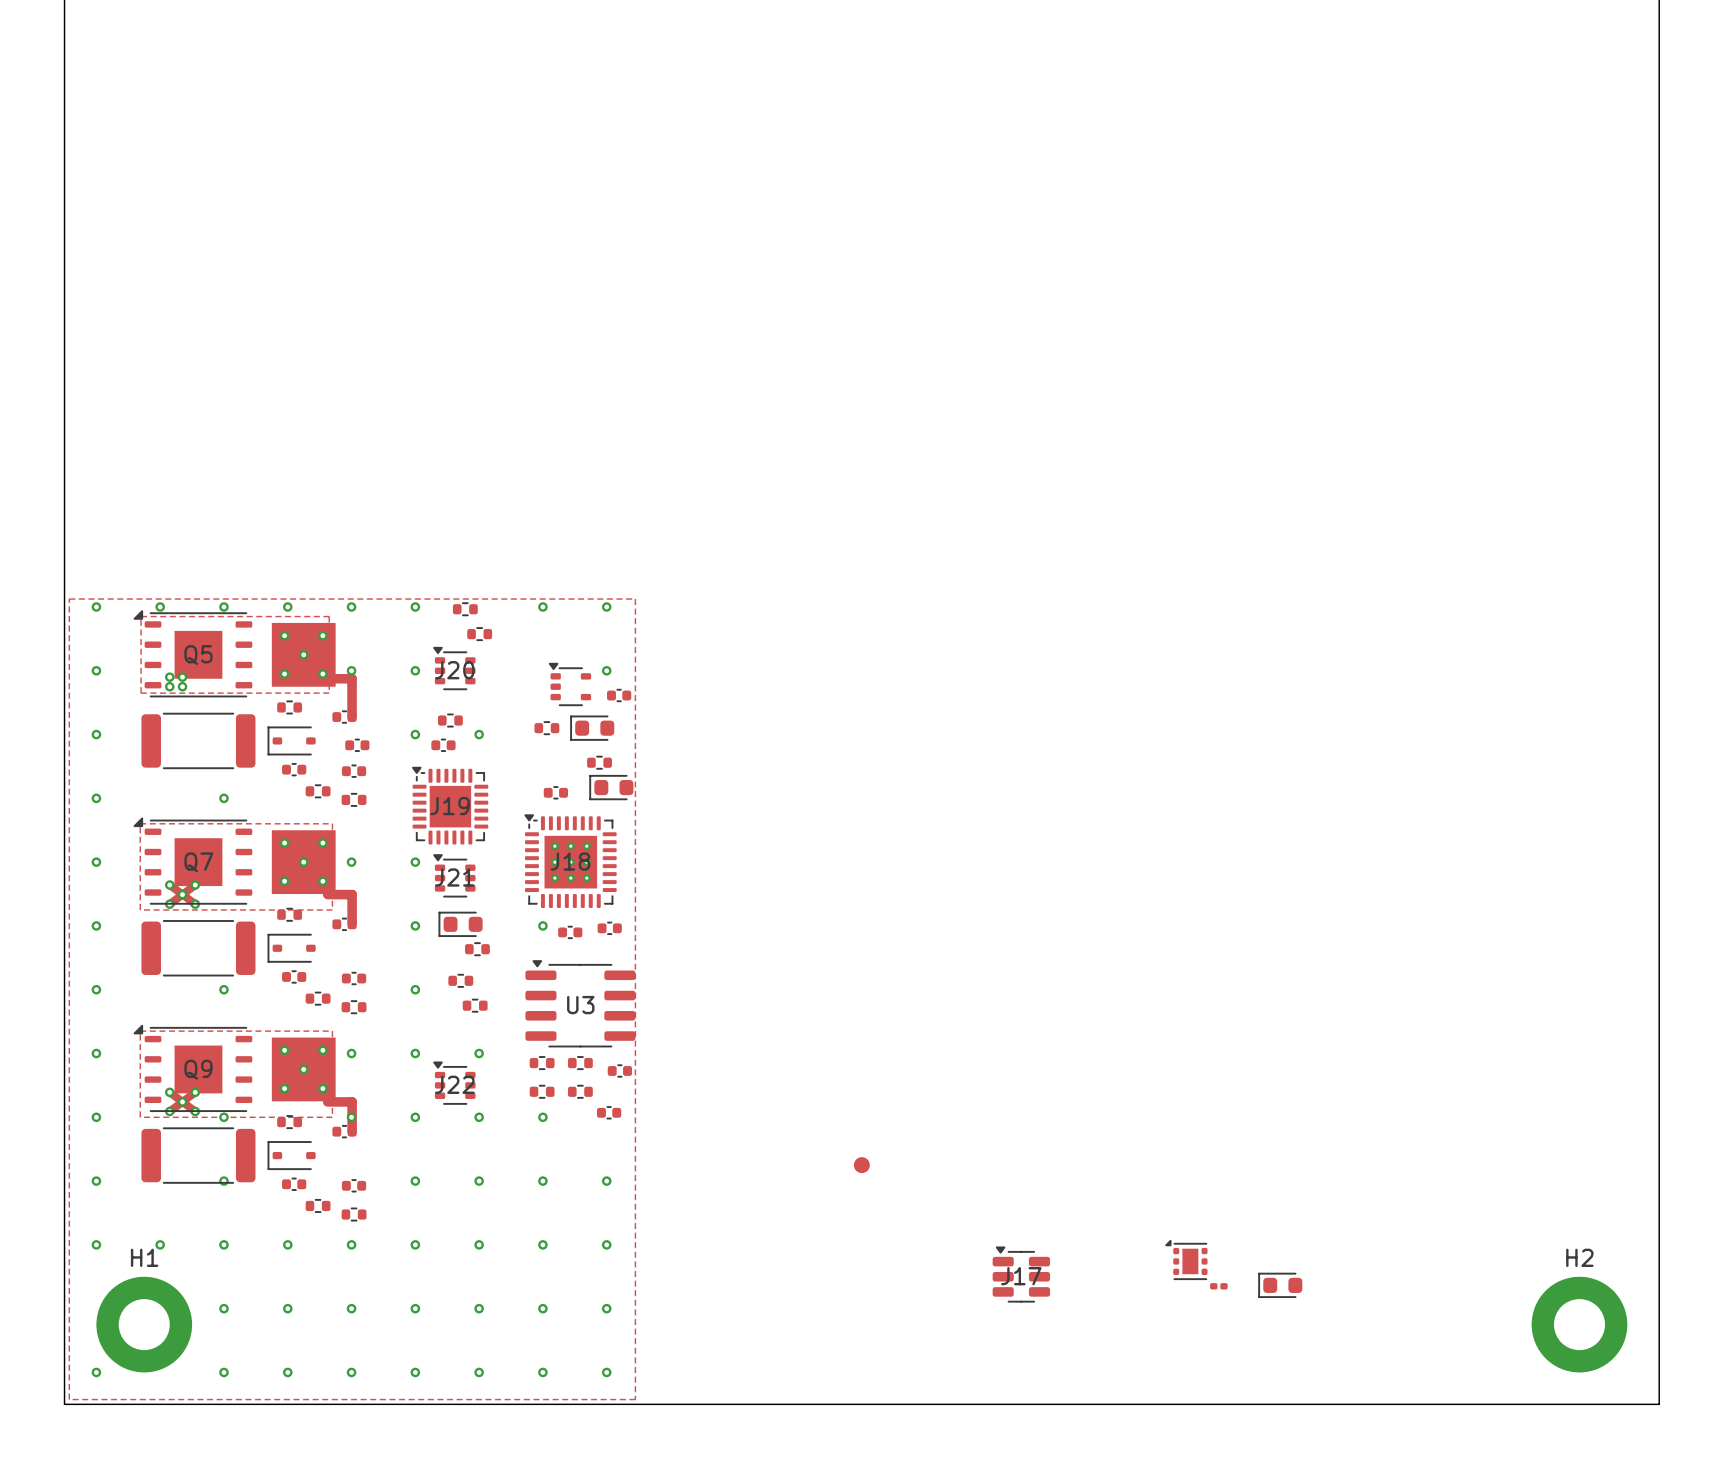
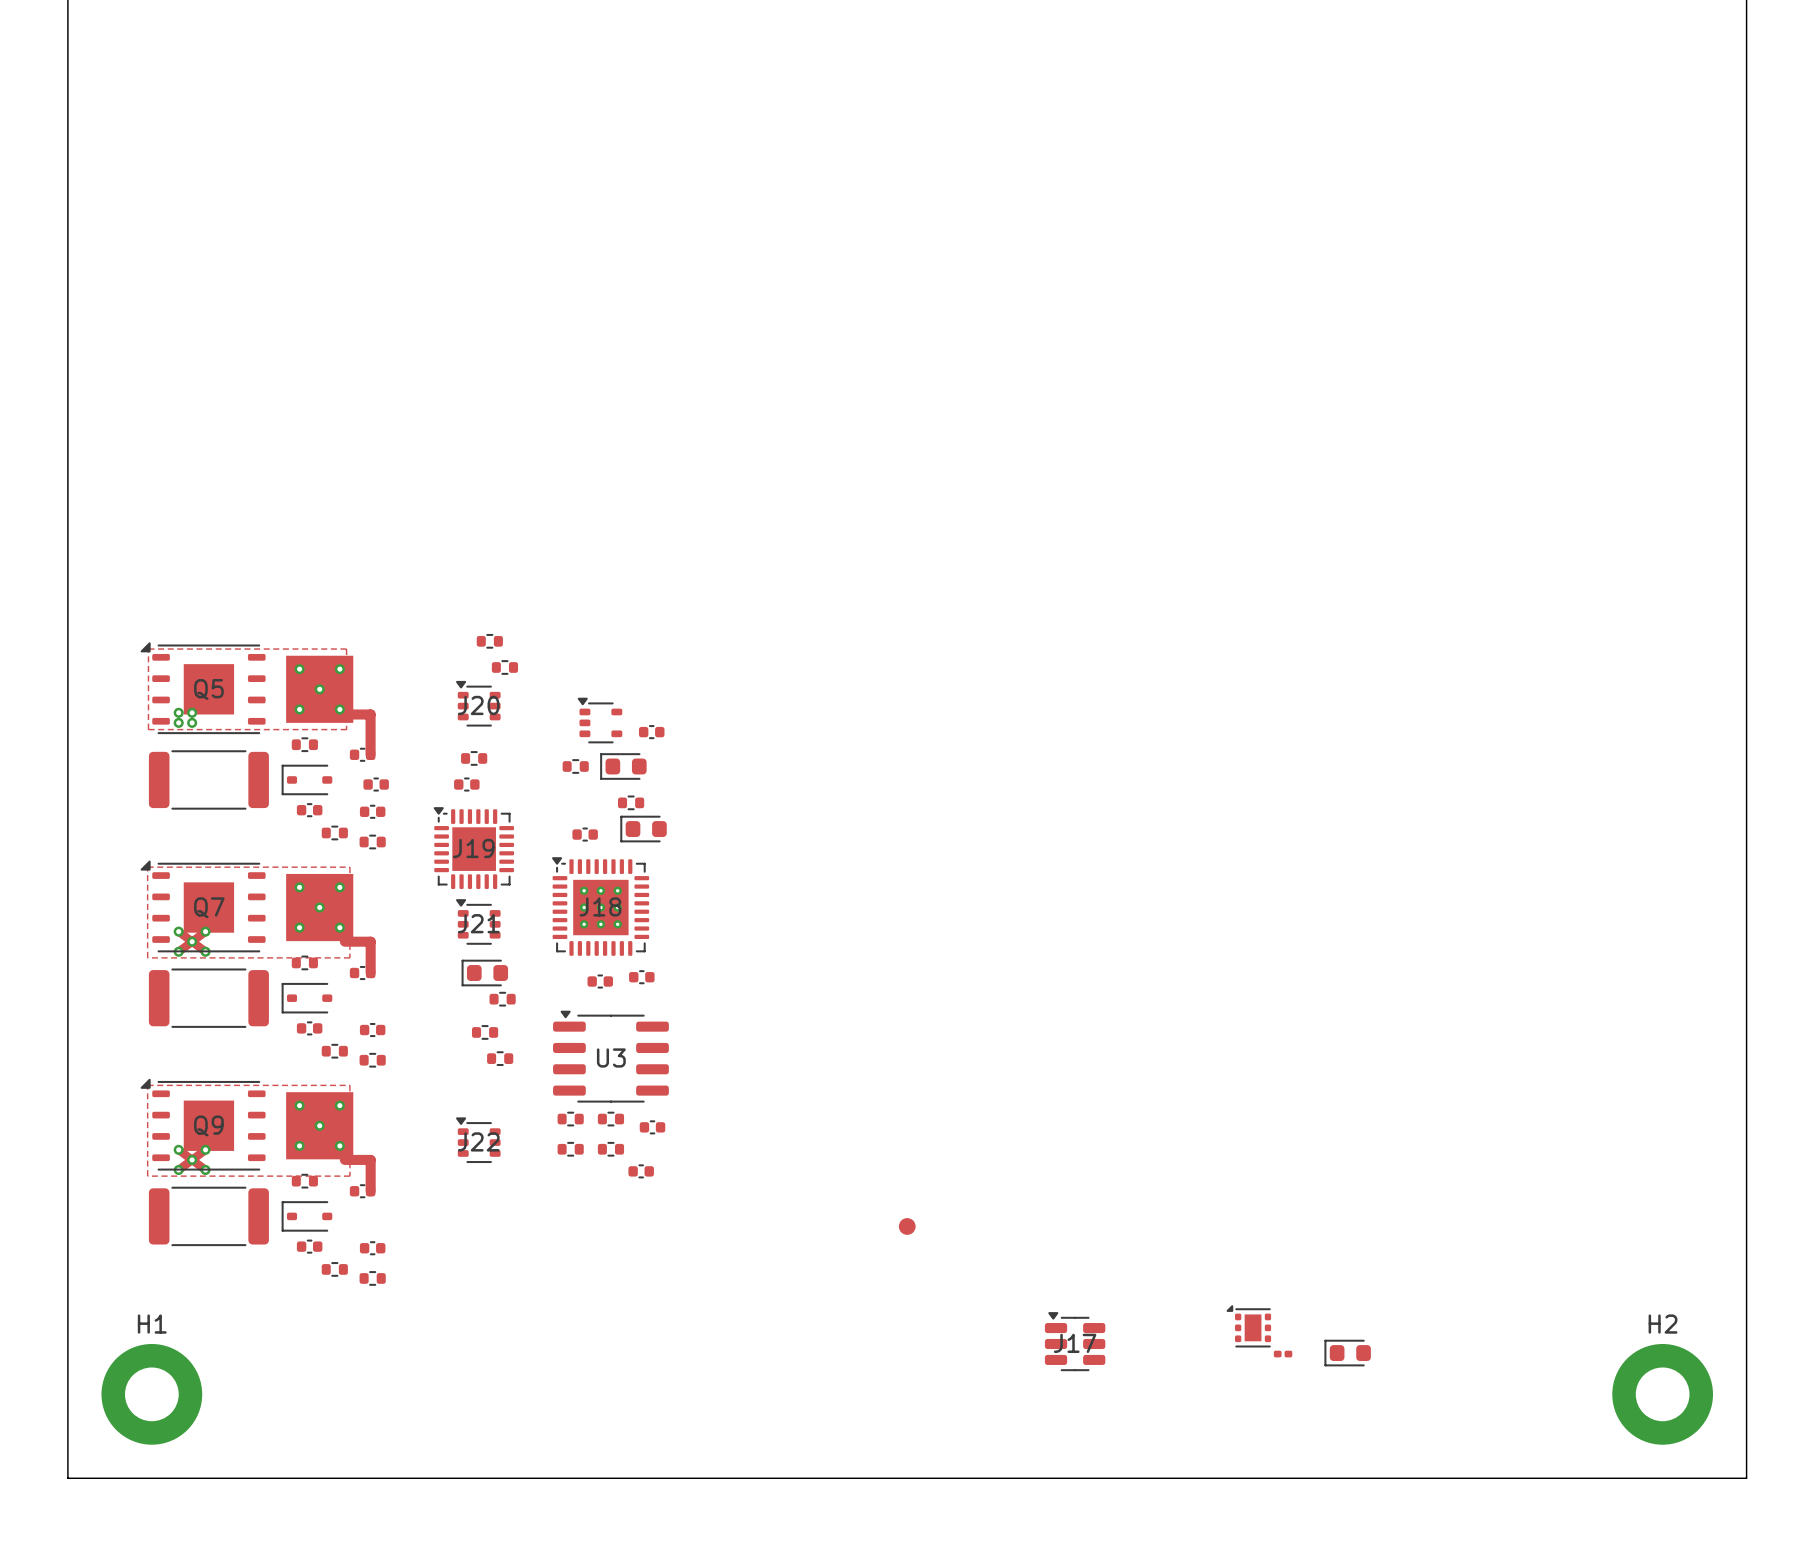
zone outline: (69, 599) (635, 599) (635, 1399) (69, 1399) (69, 599) -> none
via: (96, 606) -> none
via: (160, 606) -> none
via: (223, 606) -> none
via: (287, 606) -> none
via: (351, 606) -> none
via: (415, 606) -> none
via: (542, 606) -> none
via: (606, 606) -> none
via: (96, 670) -> none
via: (351, 670) -> none
via: (415, 670) -> none
via: (606, 670) -> none
via: (96, 734) -> none
via: (415, 734) -> none
via: (479, 734) -> none
via: (96, 798) -> none
via: (223, 798) -> none
via: (96, 862) -> none
via: (351, 862) -> none
via: (415, 862) -> none
via: (96, 925) -> none
via: (415, 925) -> none
via: (542, 925) -> none
via: (96, 989) -> none
via: (223, 989) -> none
via: (415, 989) -> none
via: (96, 1053) -> none
via: (351, 1053) -> none
via: (415, 1053) -> none
via: (479, 1053) -> none
via: (96, 1117) -> none
via: (223, 1117) -> none
via: (351, 1117) -> none
via: (415, 1117) -> none
via: (479, 1117) -> none
via: (542, 1117) -> none
via: (96, 1181) -> none
via: (223, 1181) -> none
via: (415, 1181) -> none
via: (479, 1181) -> none
via: (542, 1181) -> none
via: (606, 1181) -> none
via: (96, 1244) -> none
via: (160, 1244) -> none
via: (223, 1244) -> none
via: (287, 1244) -> none
via: (351, 1244) -> none
via: (415, 1244) -> none
via: (479, 1244) -> none
via: (542, 1244) -> none
via: (606, 1244) -> none
via: (223, 1308) -> none
via: (287, 1308) -> none
via: (351, 1308) -> none
via: (415, 1308) -> none
via: (479, 1308) -> none
via: (542, 1308) -> none
via: (606, 1308) -> none
via: (96, 1372) -> none
via: (223, 1372) -> none
via: (287, 1372) -> none
via: (351, 1372) -> none
via: (415, 1372) -> none
via: (479, 1372) -> none
via: (542, 1372) -> none
via: (606, 1372) -> none

